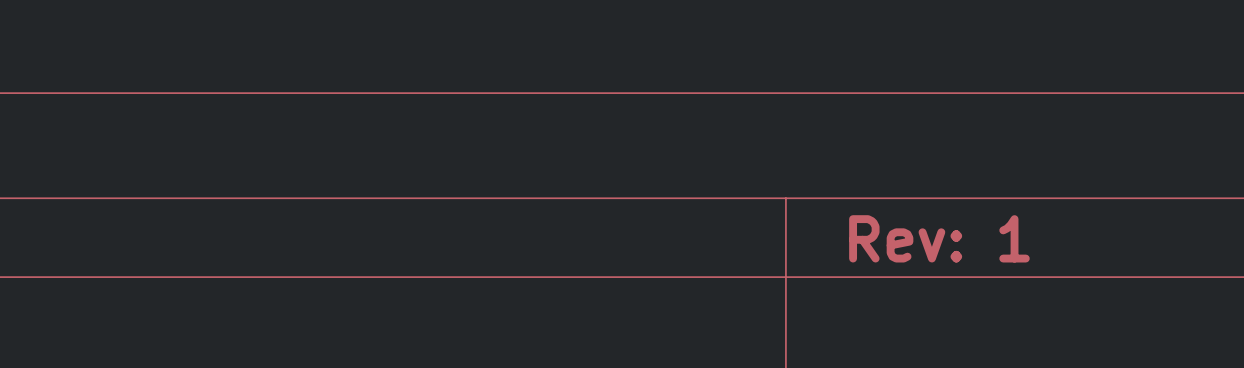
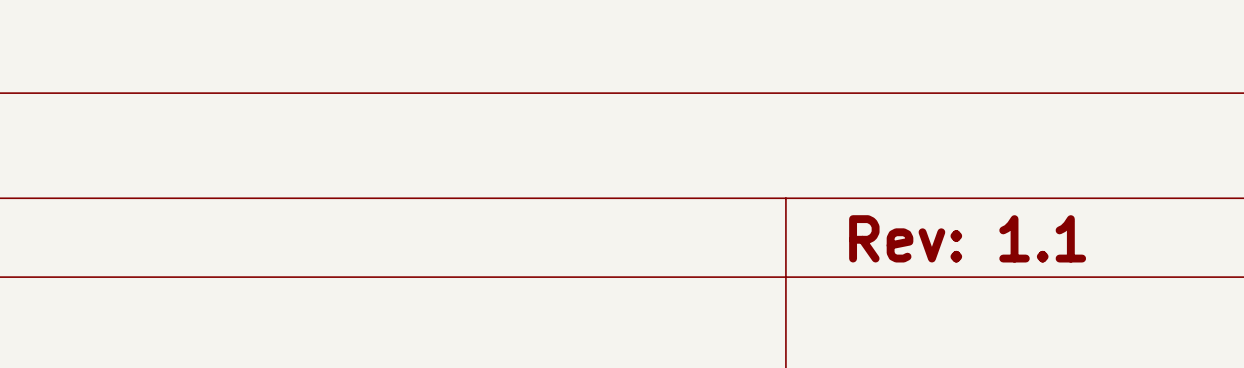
title block: Rev: 1 (939, 238) -> Rev: 1.1 (967, 238)

